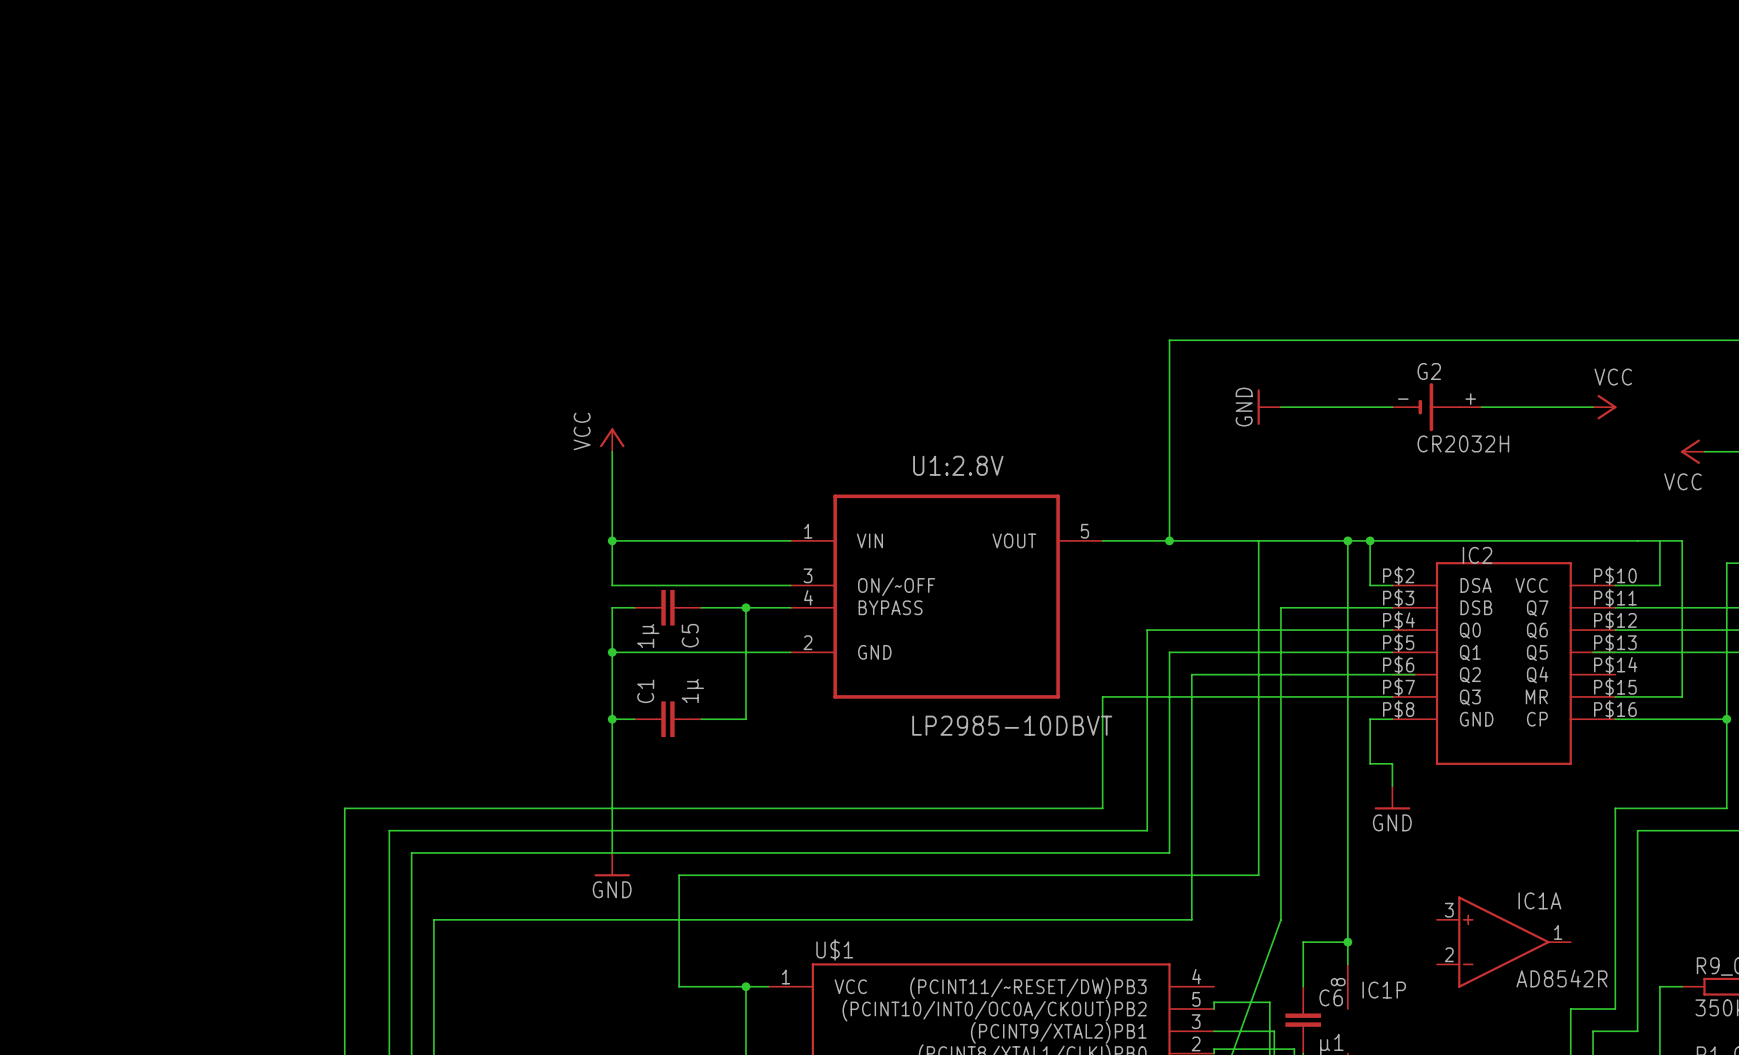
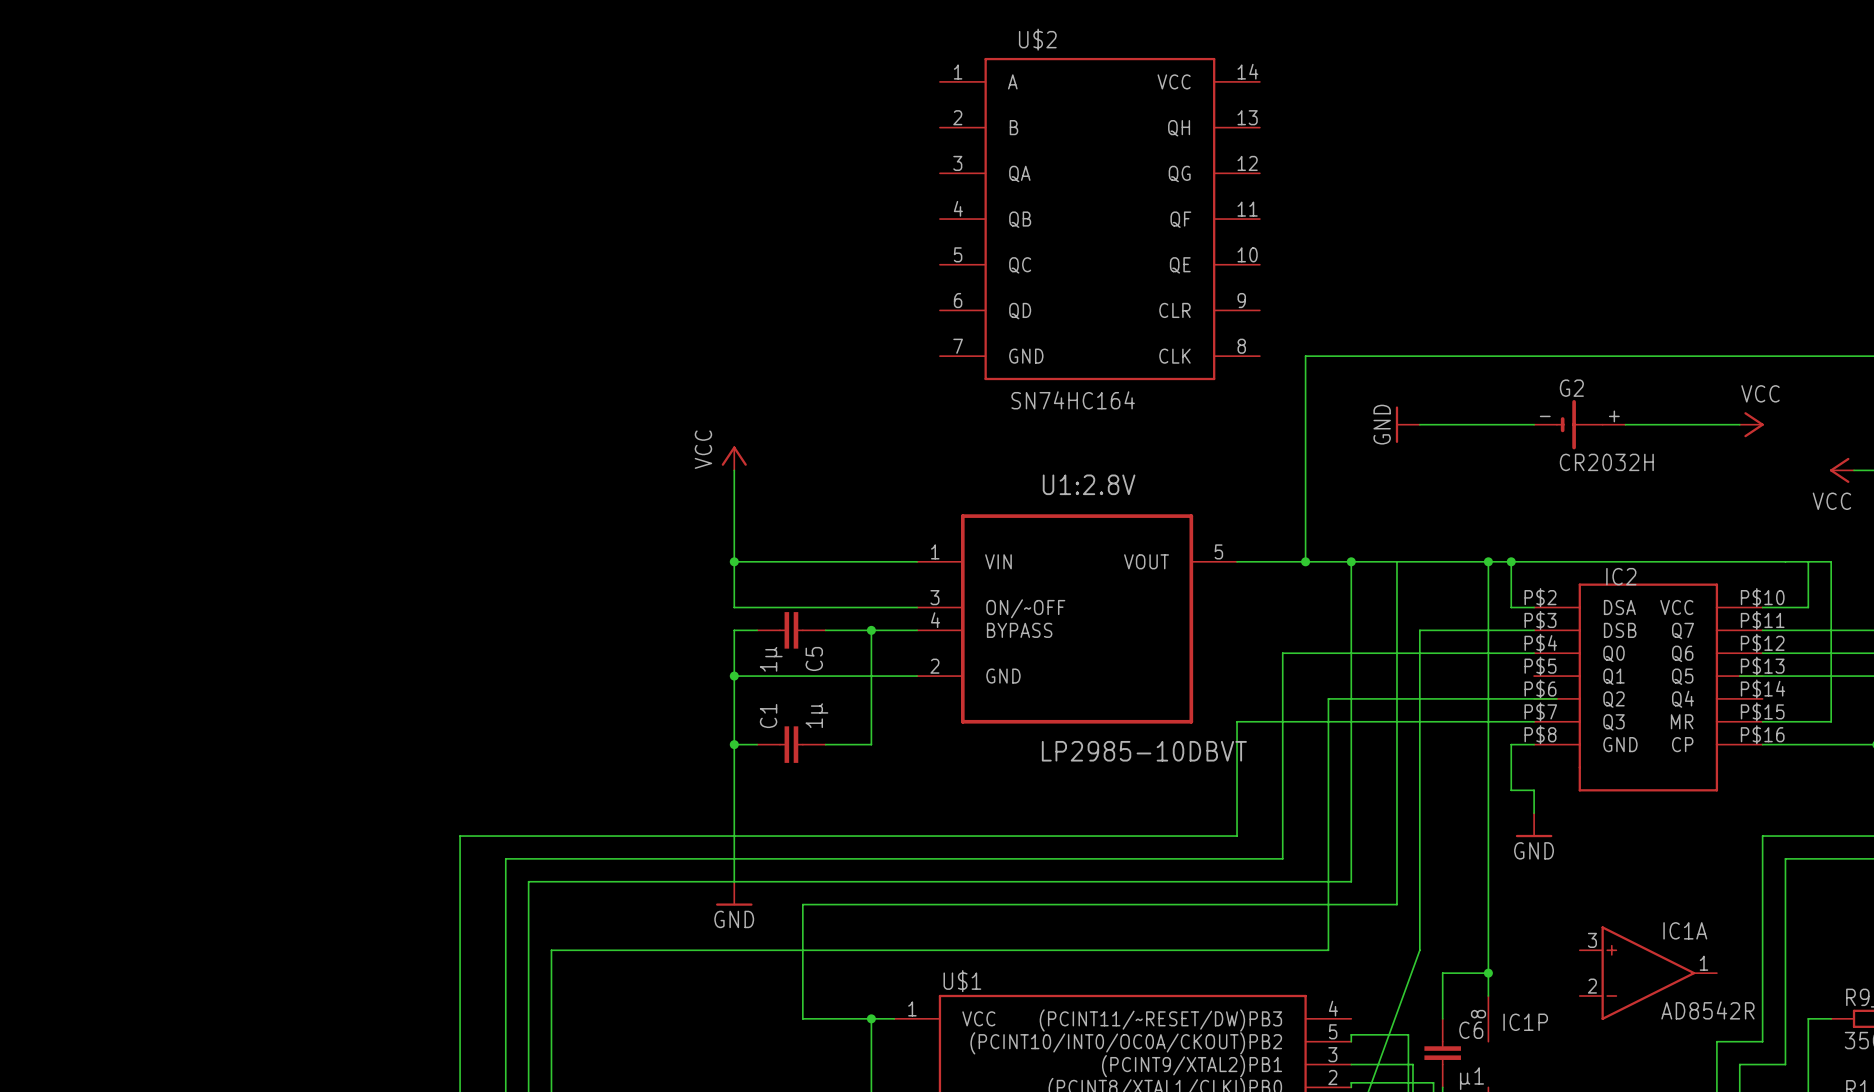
U$2: none -> SN74HC164 (1099, 219)
junction: none -> (1351, 561)
wire: (1392, 652) (1169, 652) (1169, 852) -> (1351, 561) (1351, 881) (1305, 881)

